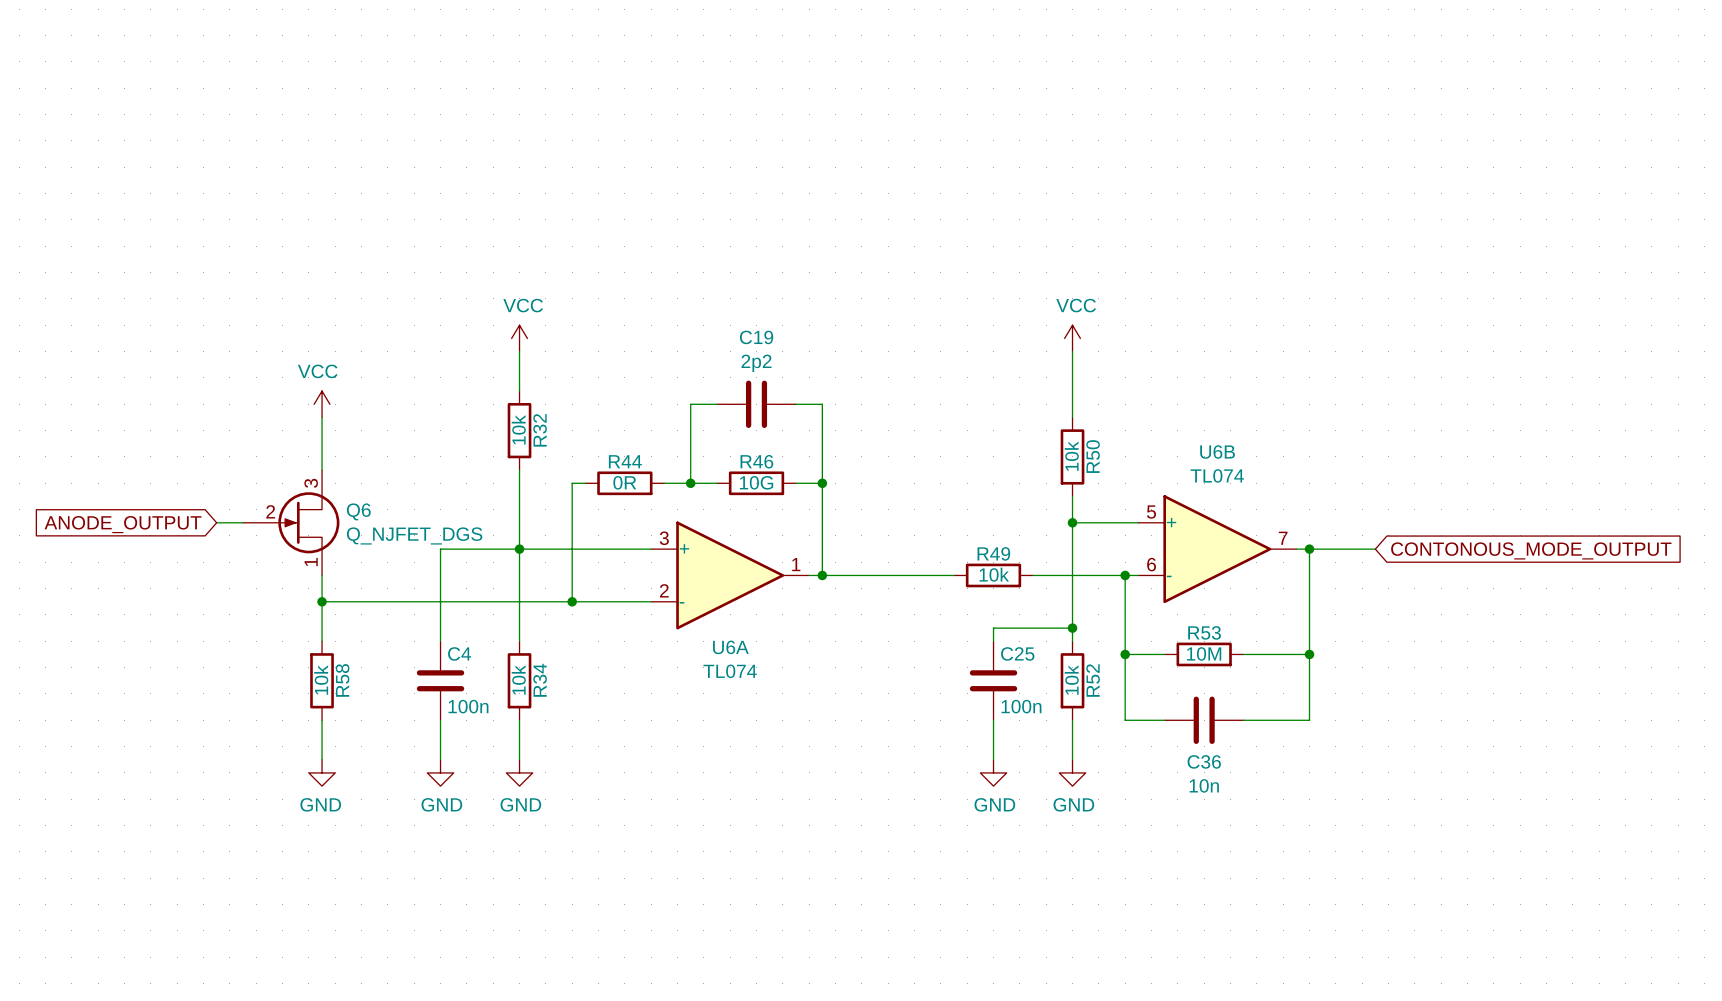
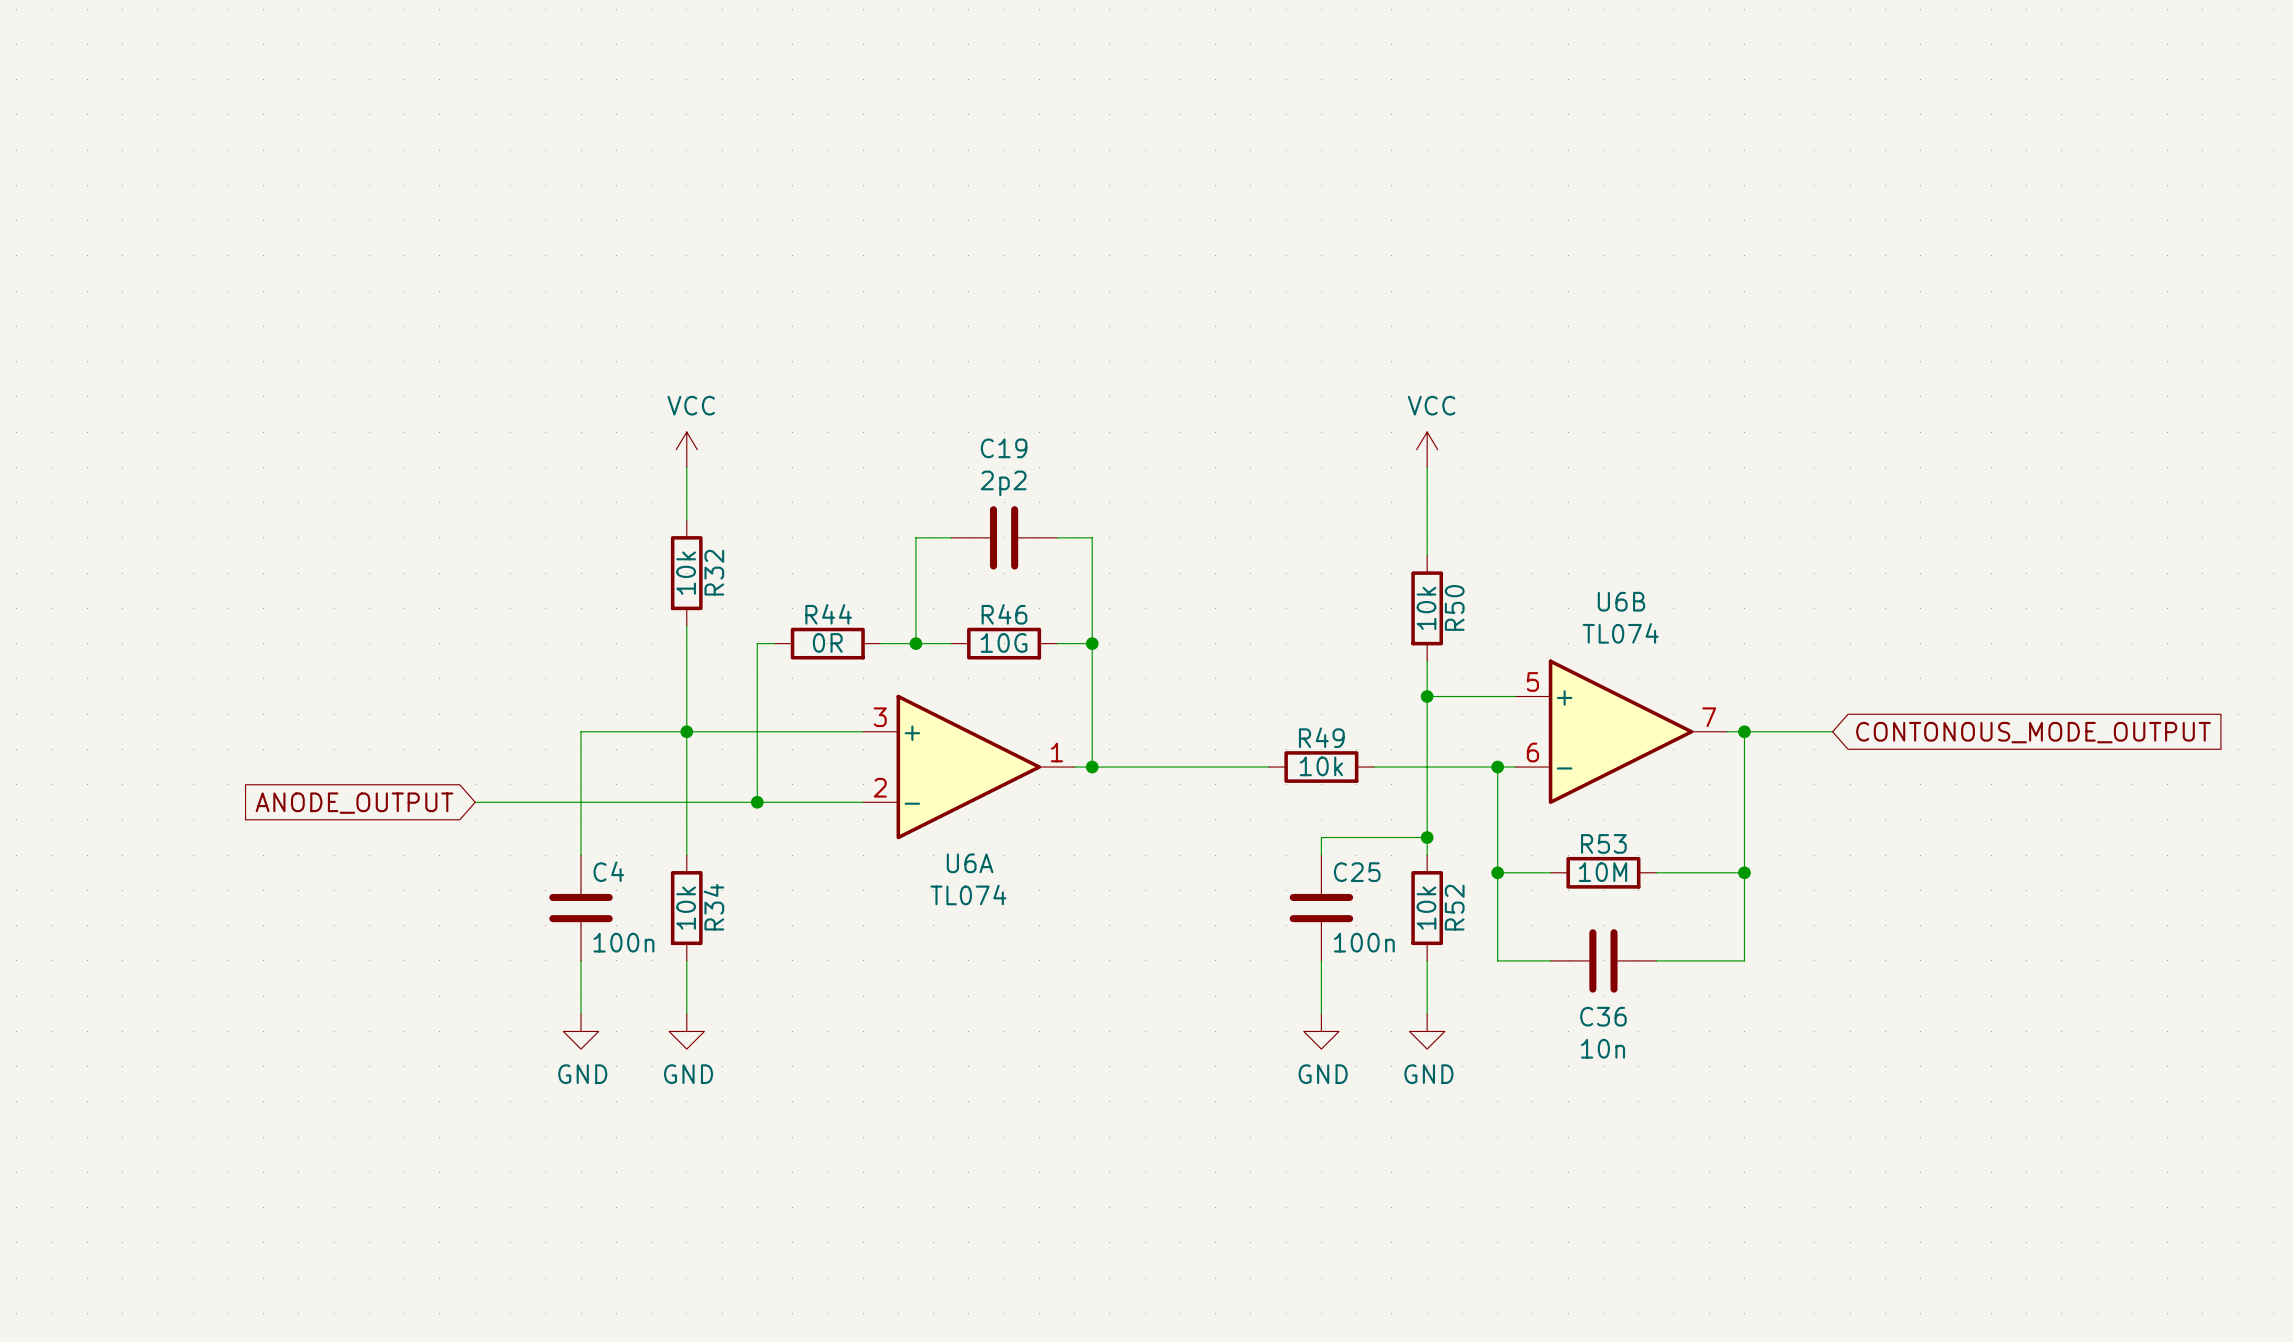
power symbol: VCC (322, 404) -> none
wire: (322, 417) (322, 470) -> none
wire: (216, 522) (243, 522) -> none
Q6: Q_NJFET_DGS (291, 522) -> none
global label position: ANODE_OUTPUT (122, 524) -> ANODE_OUTPUT (354, 803)
wire: (322, 575) (322, 641) -> none
wire: (322, 601) (361, 601) -> none
junction: (322, 601) -> none
R58: 10k (322, 680) -> none
wire: (322, 720) (322, 759) -> none
power symbol: GND (322, 772) -> none

